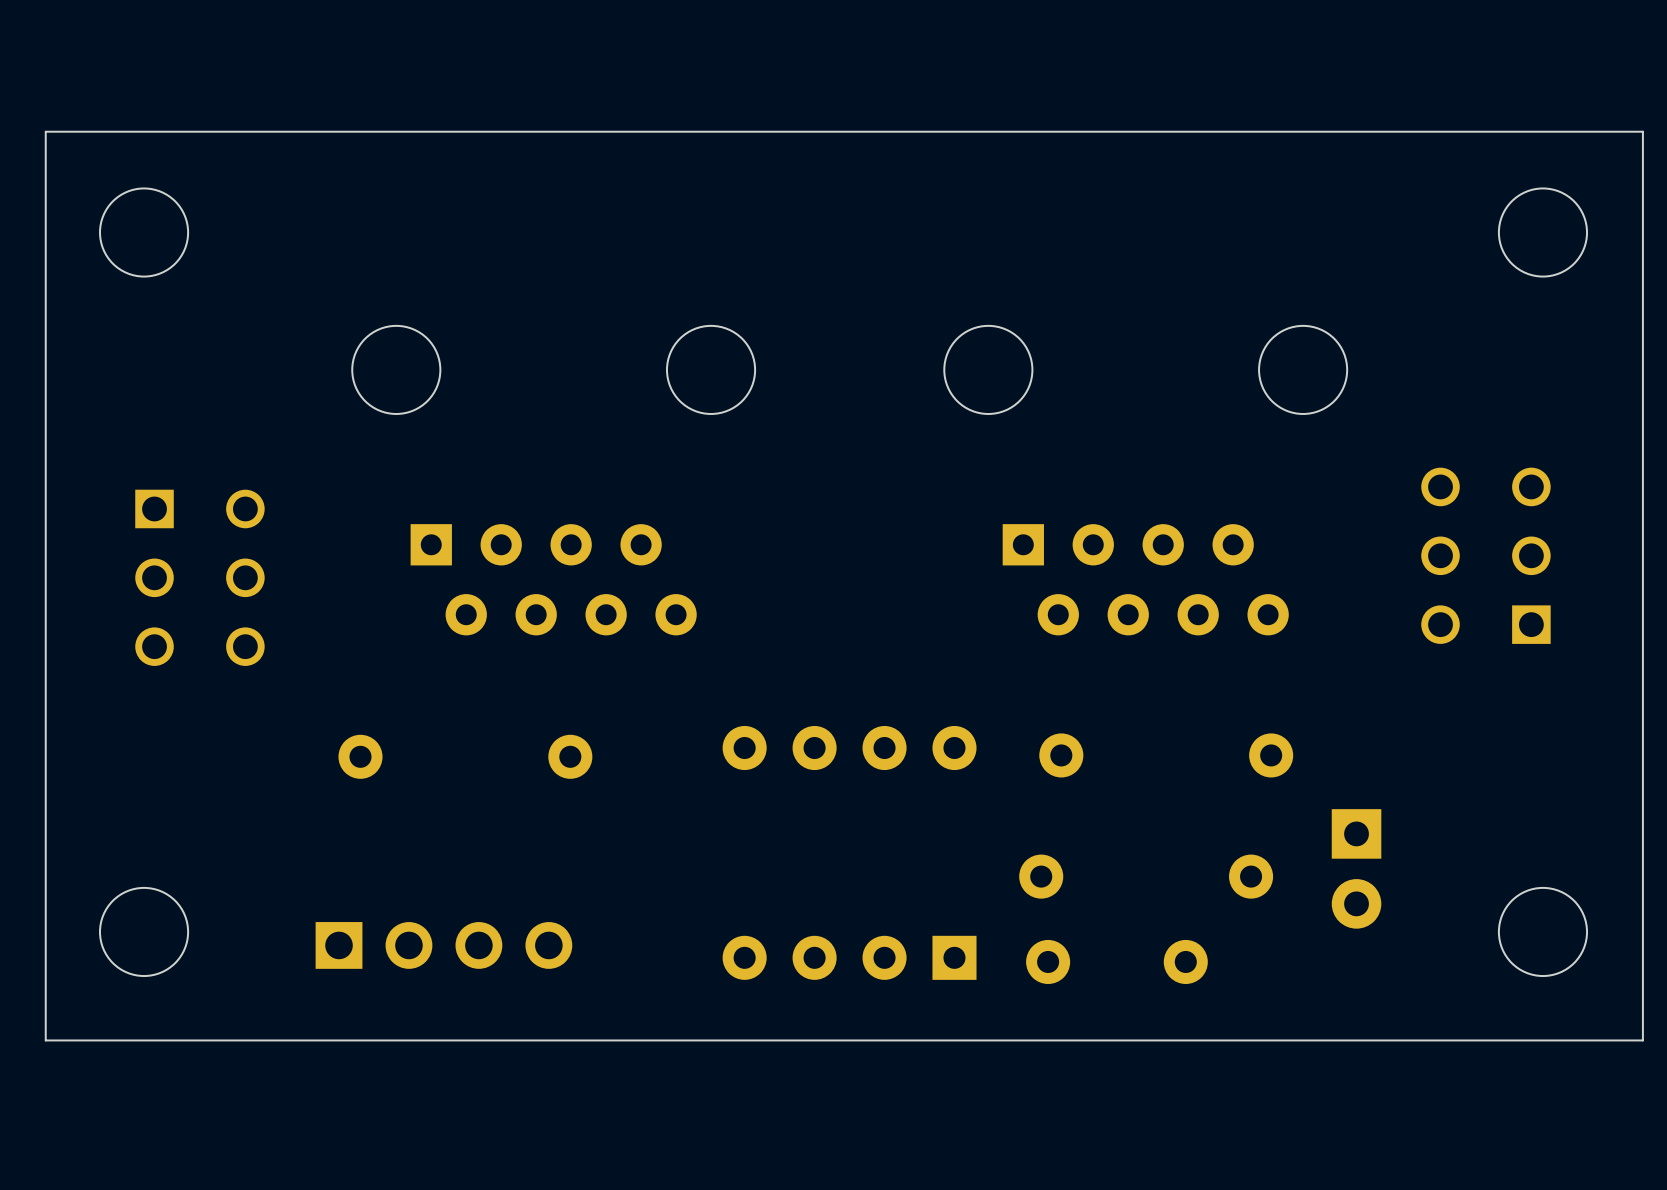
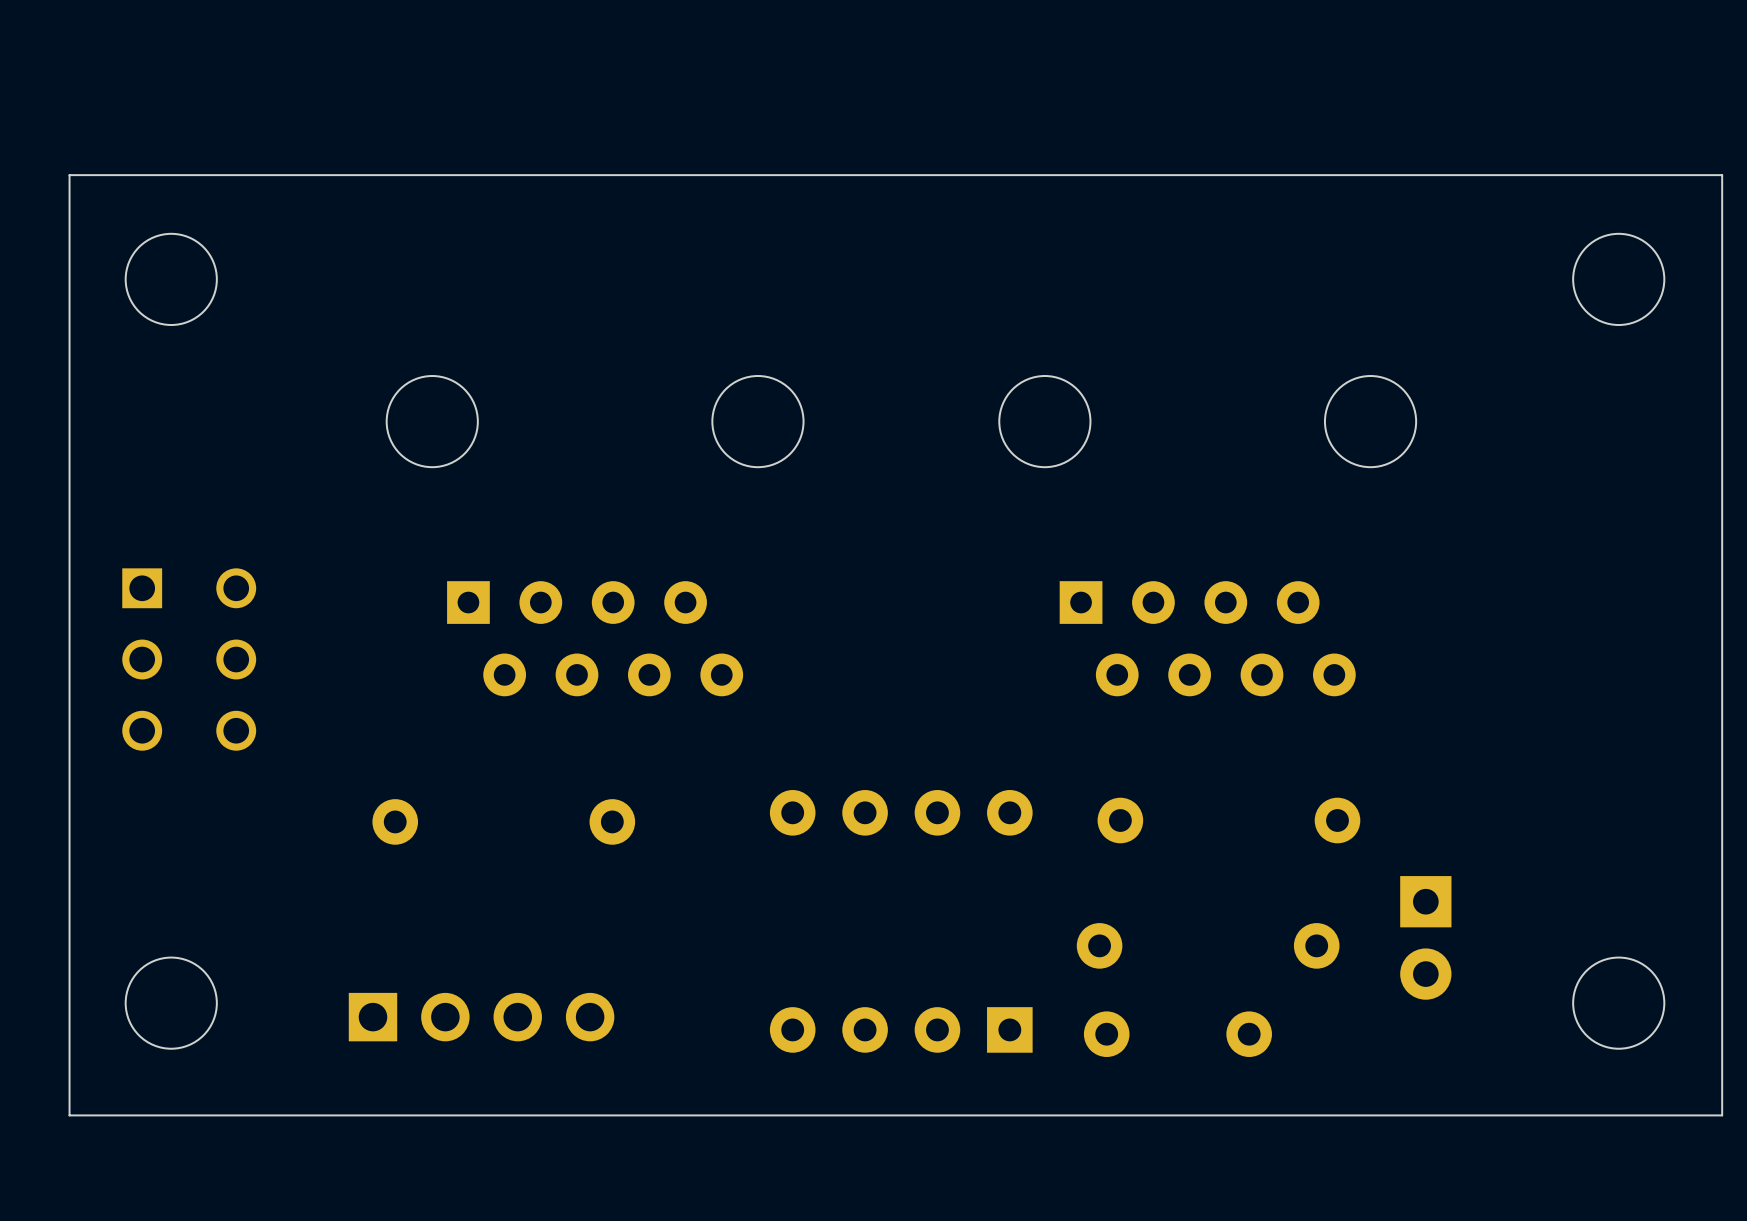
part: (1485, 555) -> none
part position: (199, 577) -> (189, 659)

